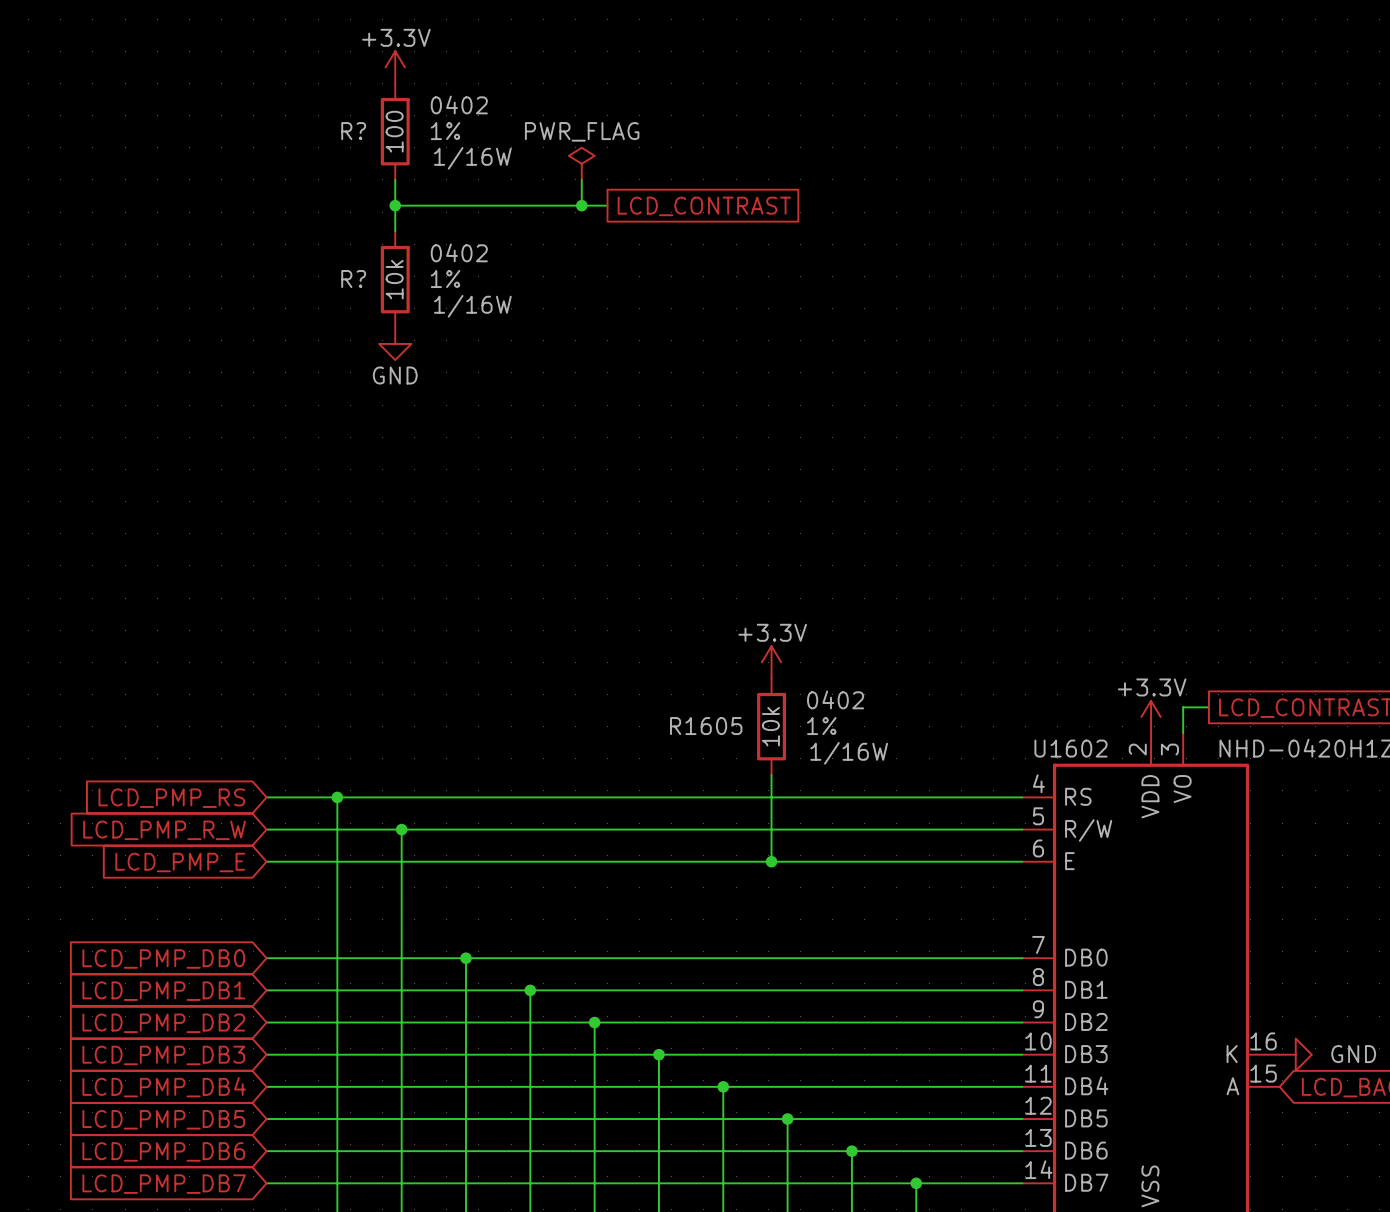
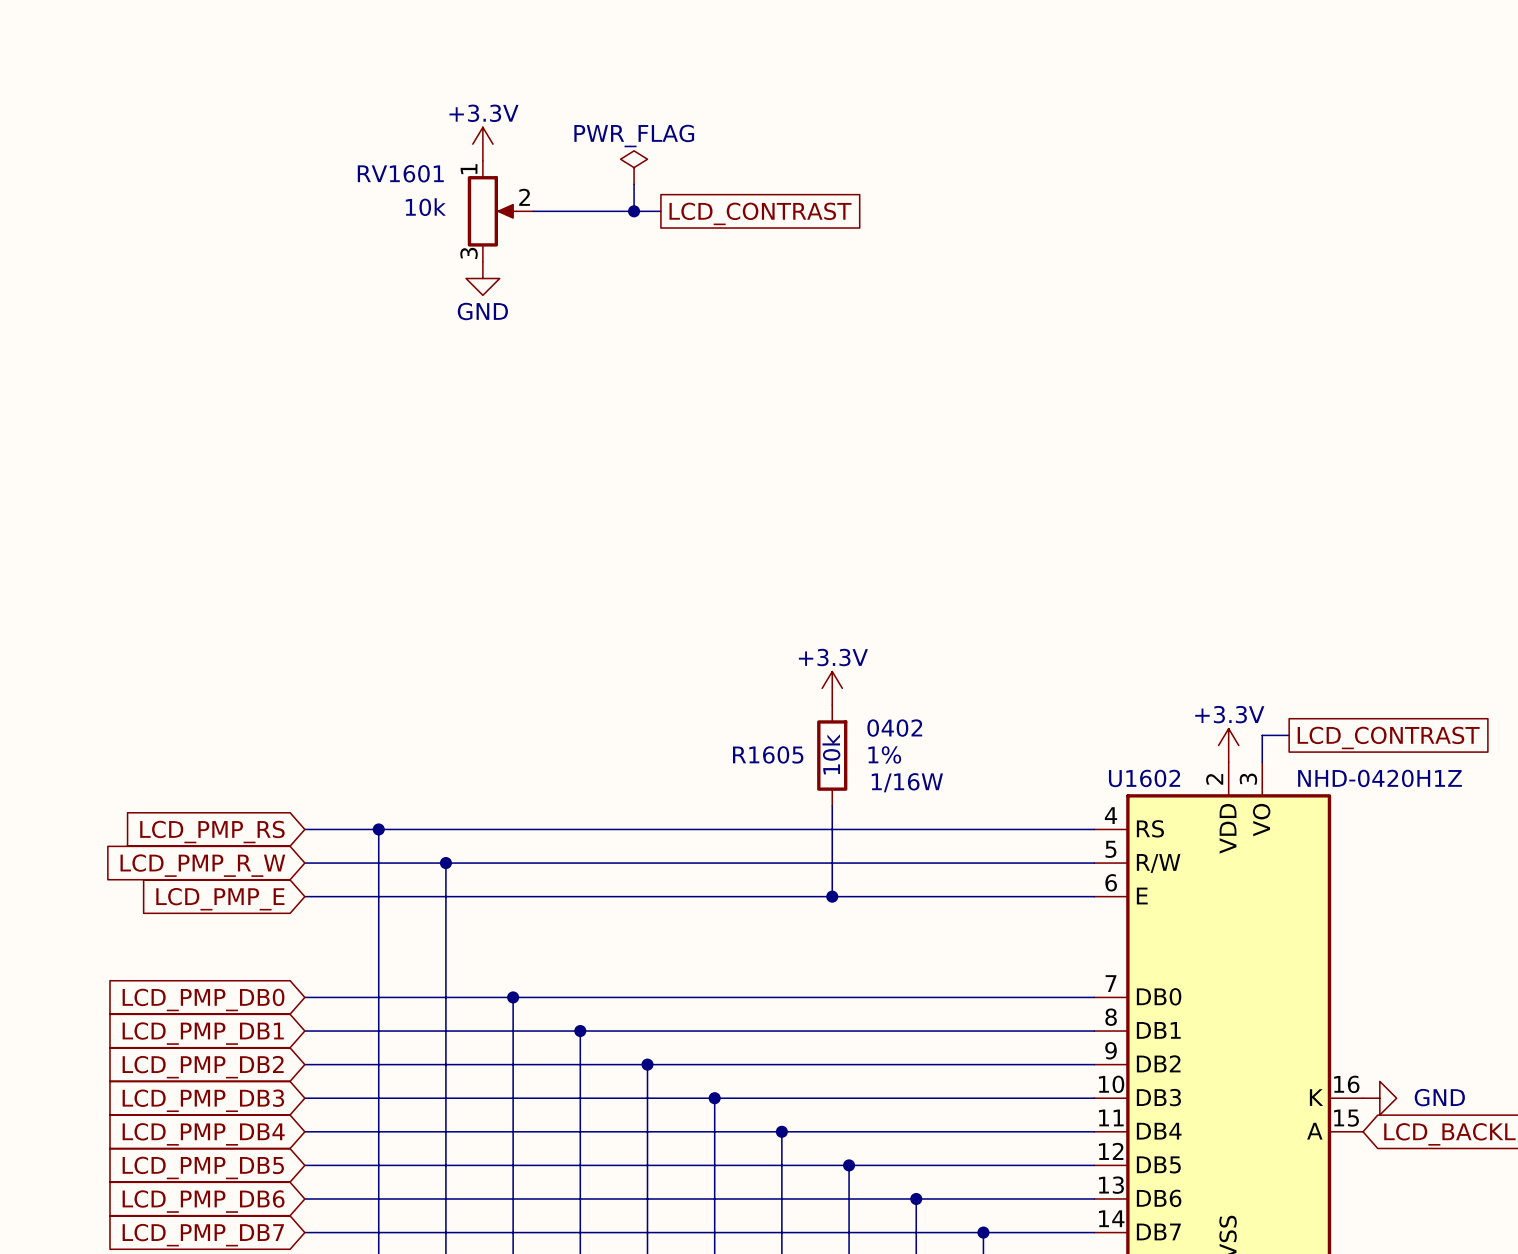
power symbol position: +3.3V (395, 67) -> +3.3V (482, 144)
R?: 100 (395, 131) -> none
wire: (395, 179) (395, 231) -> none
wire: (395, 205) (485, 205) -> none
junction: (395, 205) -> none
RV1601: none -> 10k (500, 211)
R?: 10k (395, 279) -> none
power symbol position: GND (395, 343) -> GND (482, 278)

